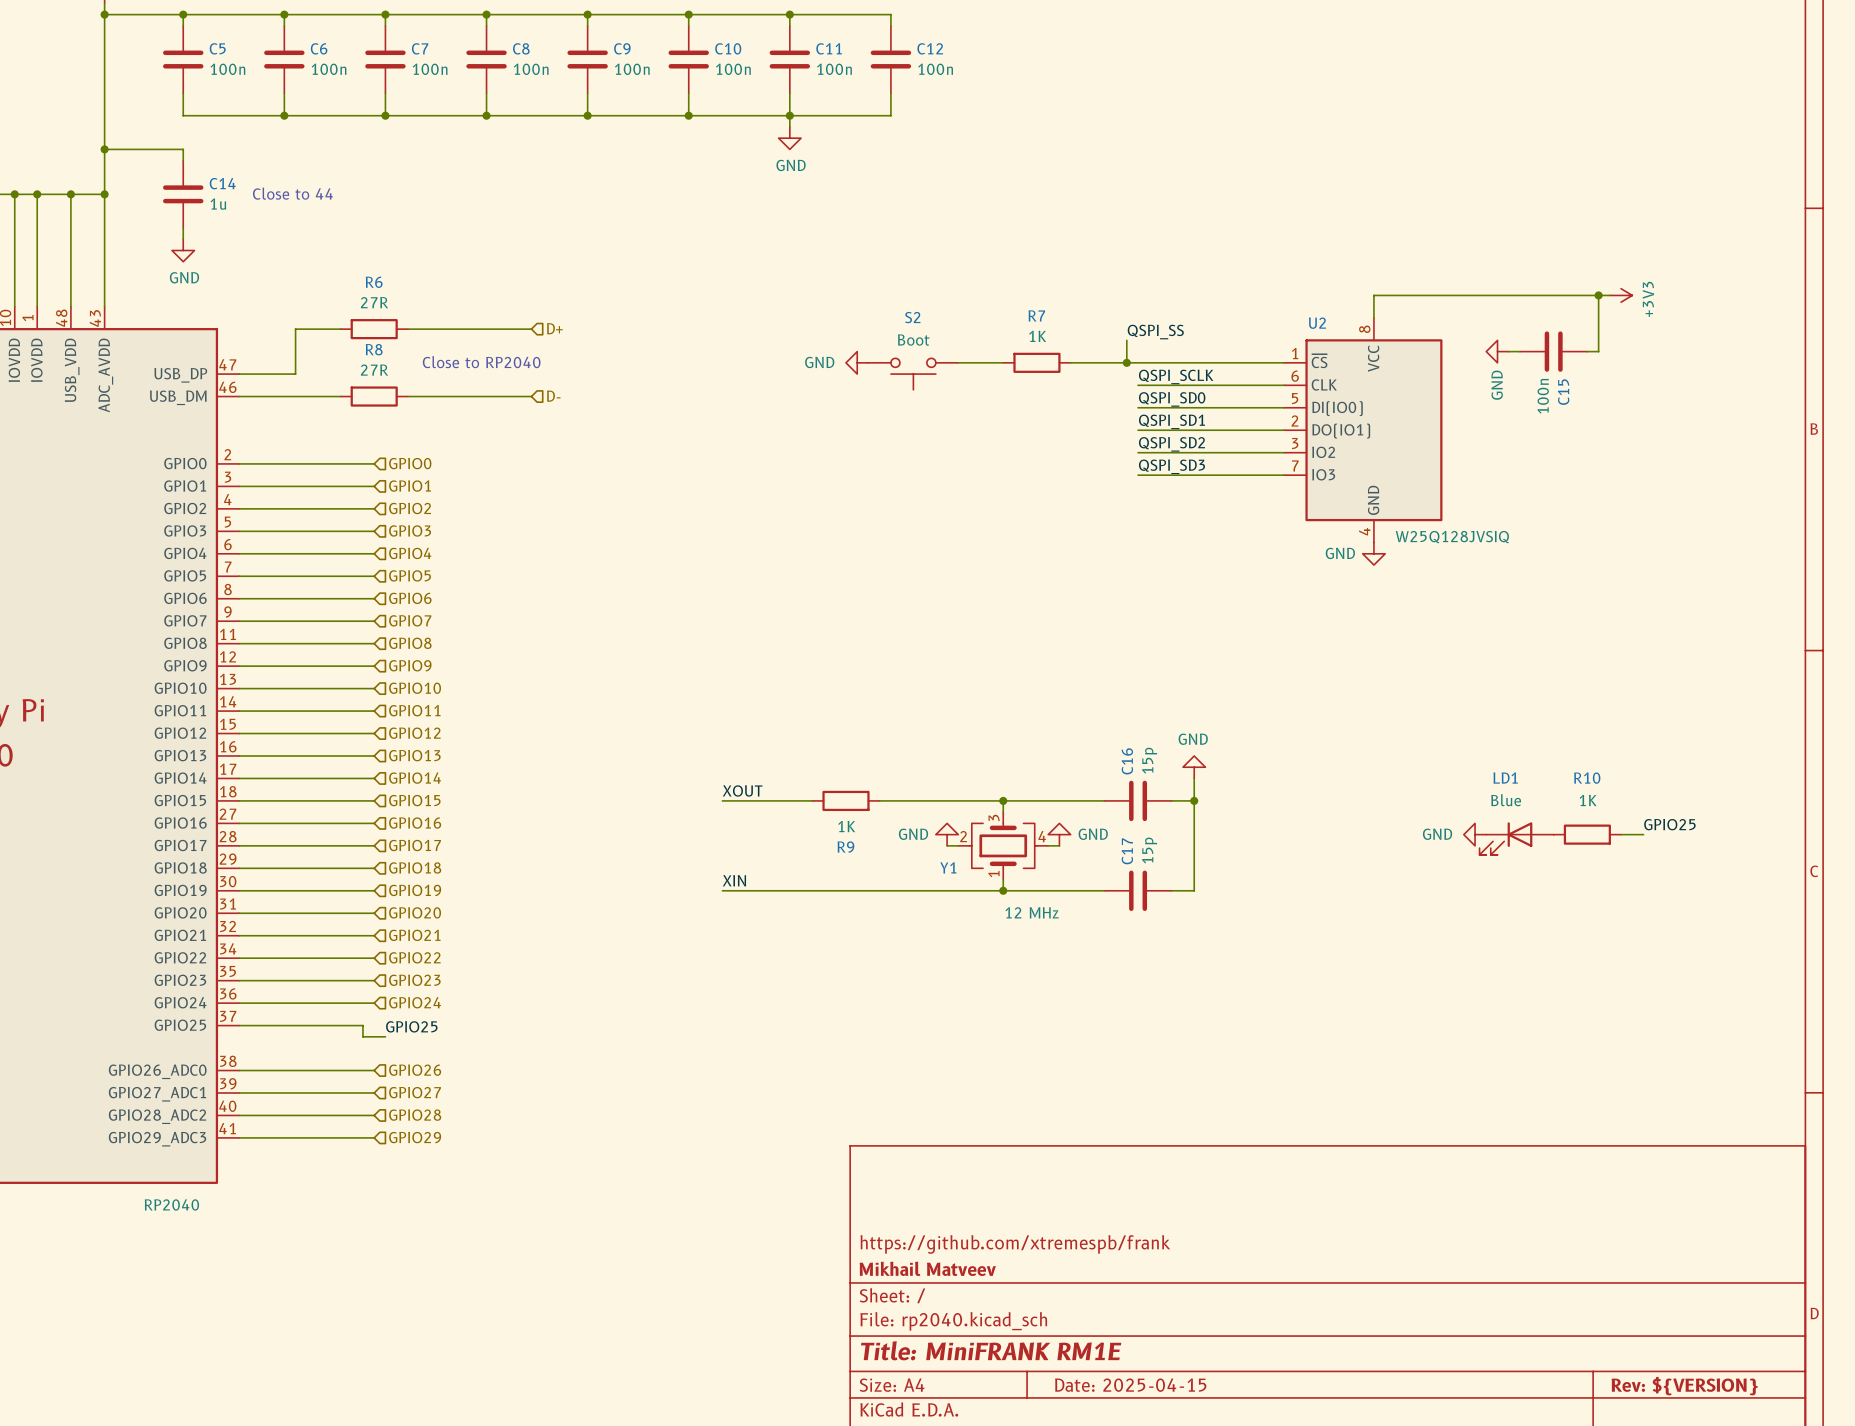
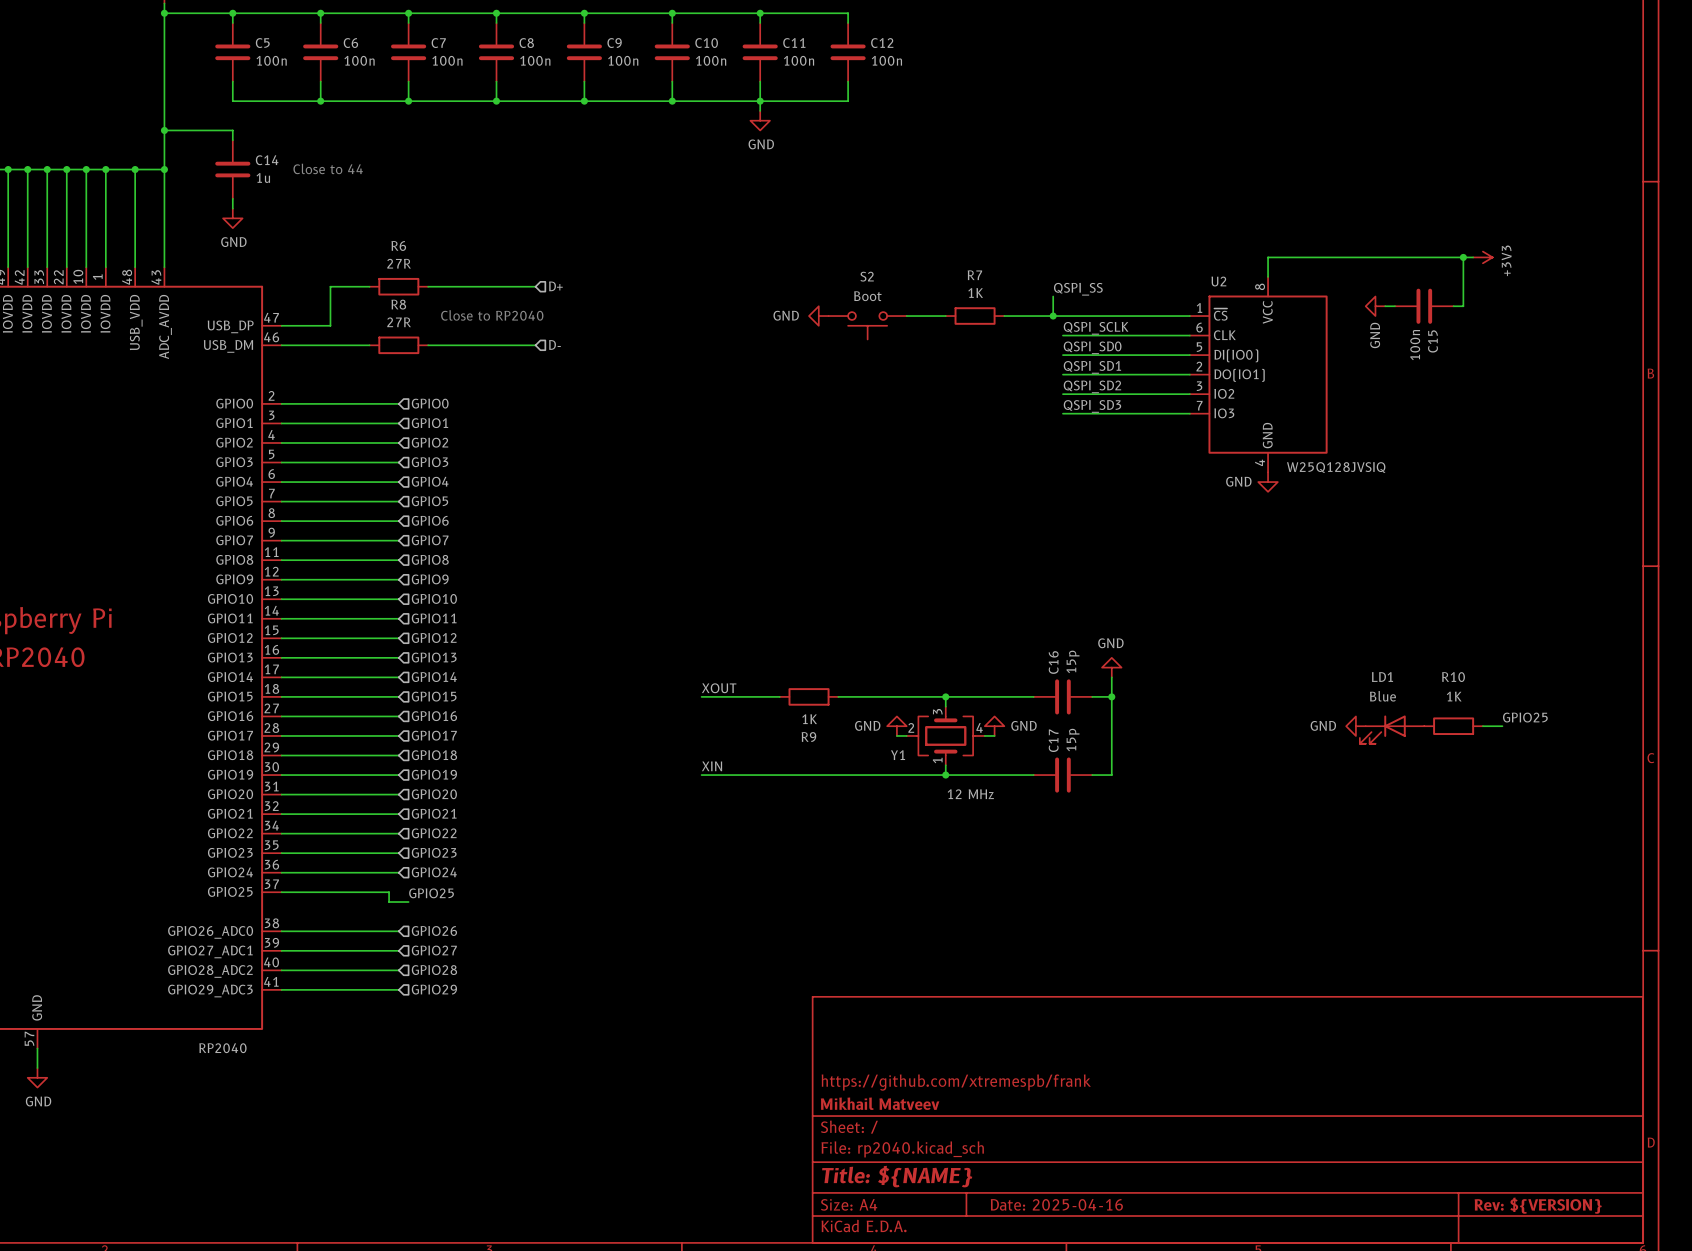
title block: Title: MiniFRANK RM1E (991, 1350) -> Title: ${NAME} (897, 1176)
title block: Date: 2025-04-15 (1130, 1385) -> Date: 2025-04-16 (1056, 1204)

